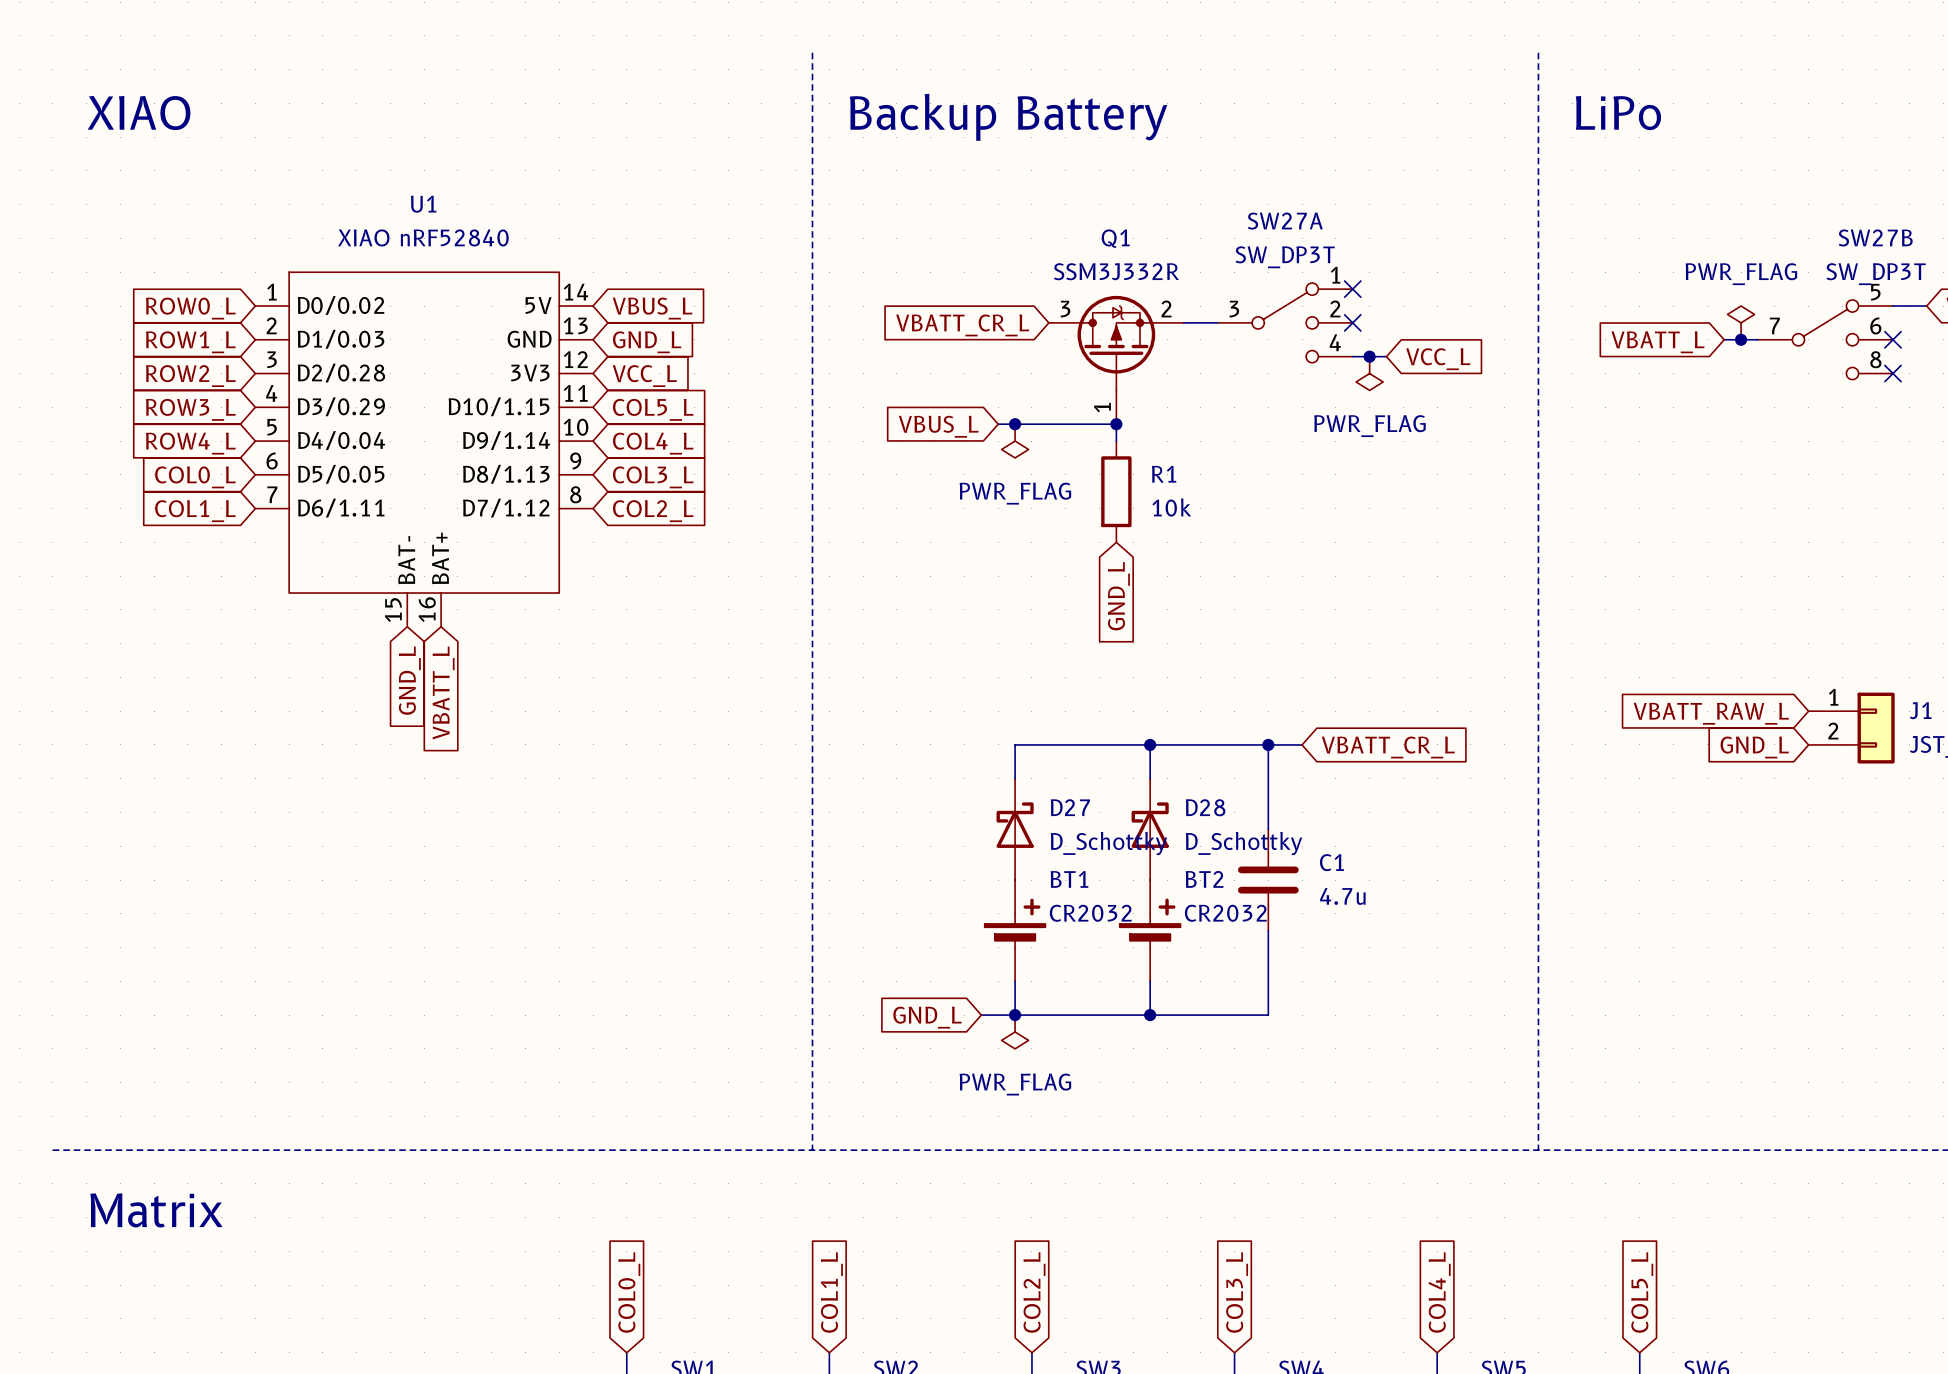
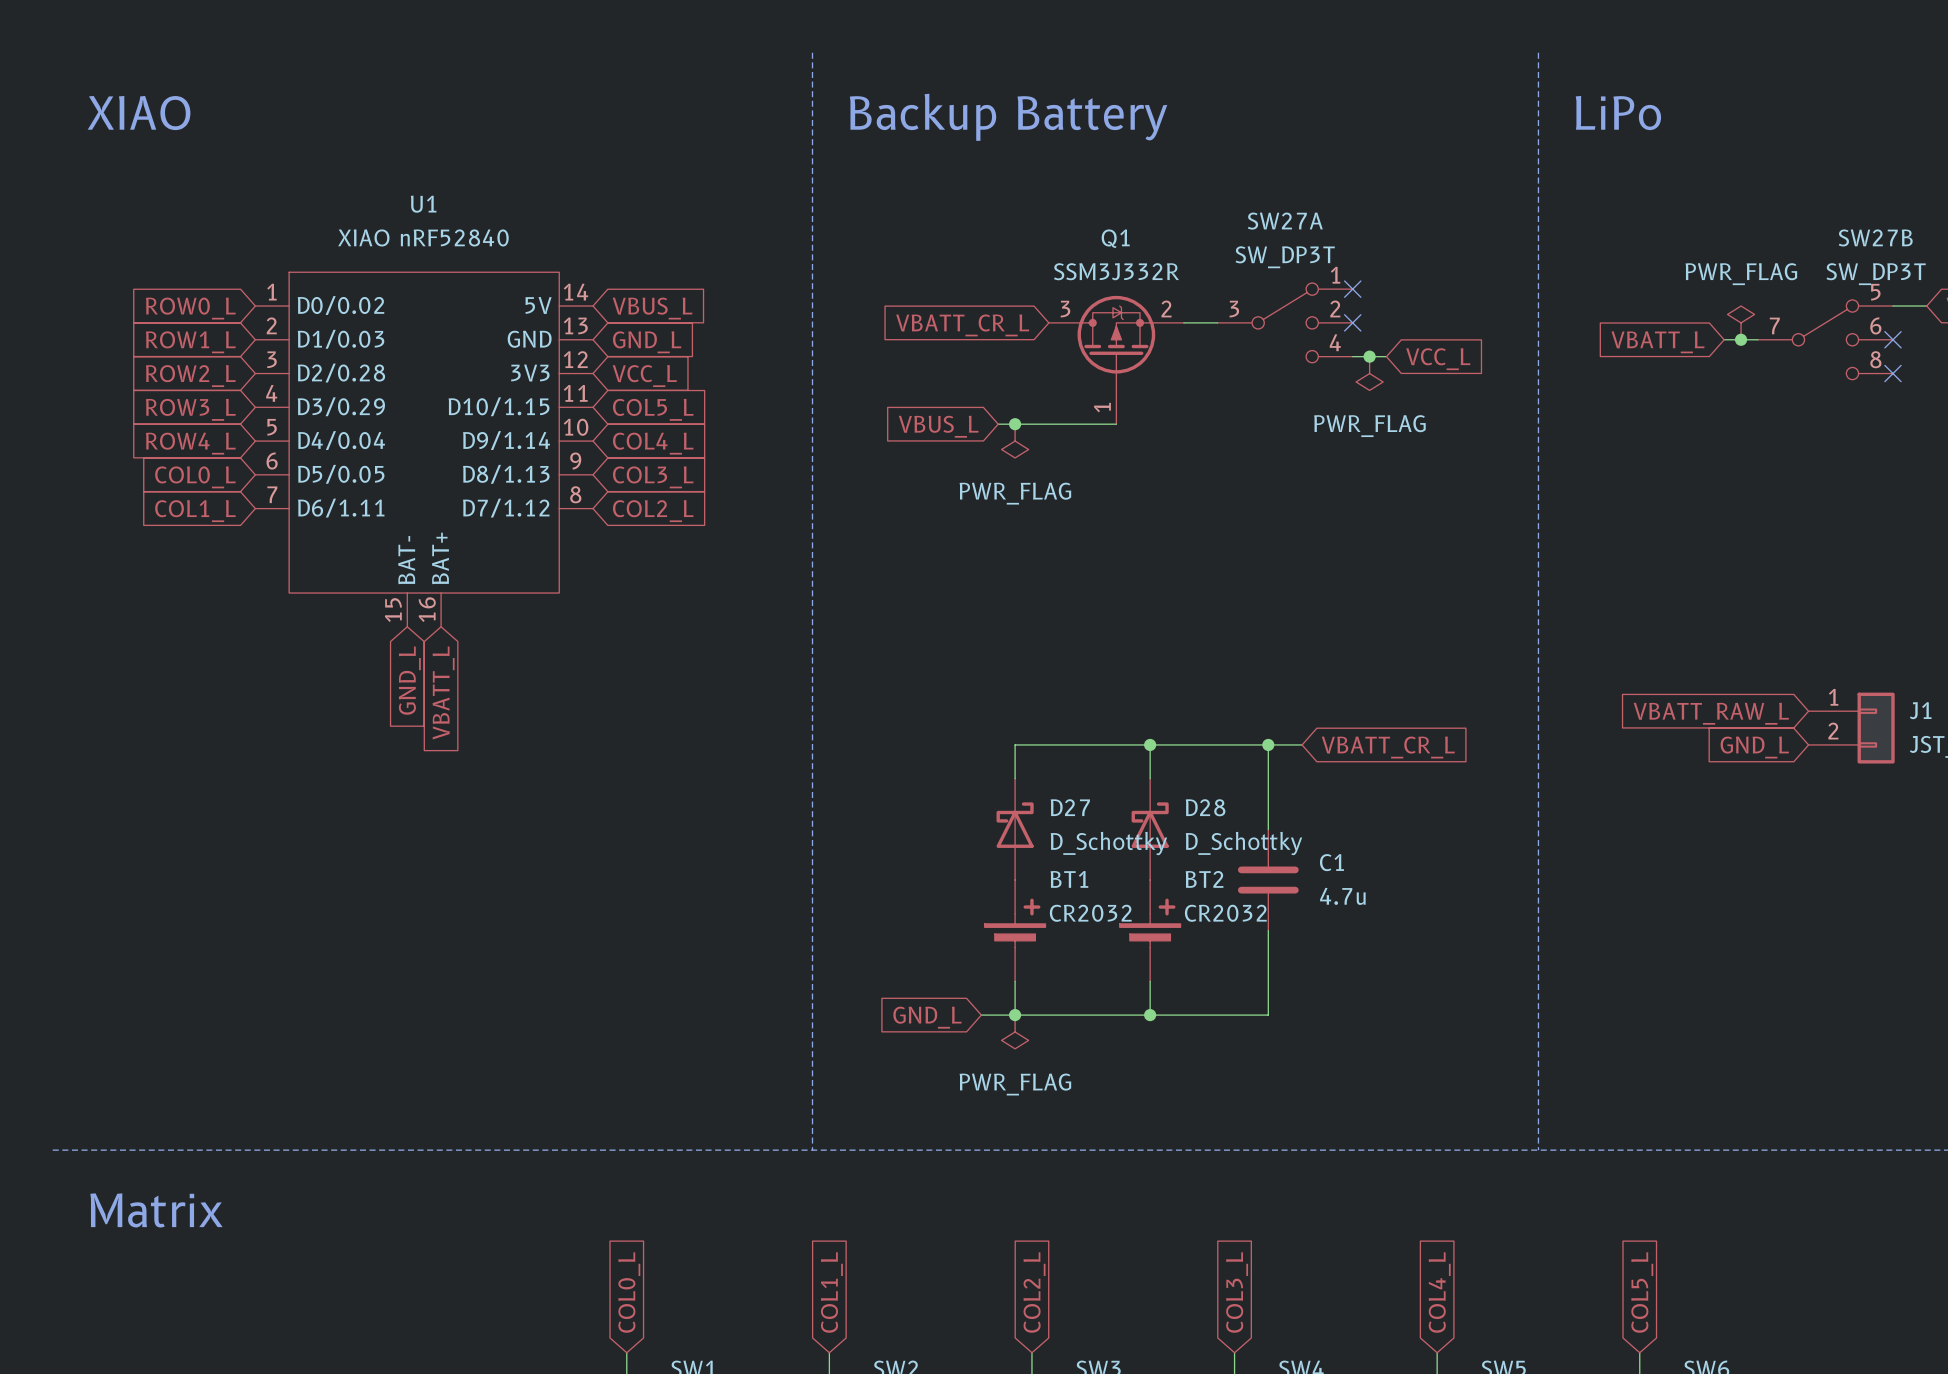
wire: (1116, 424) (1116, 441) -> none
junction: (1116, 424) -> none
R1: 10k (1116, 491) -> none
global label: GND_L (1118, 596) -> none

